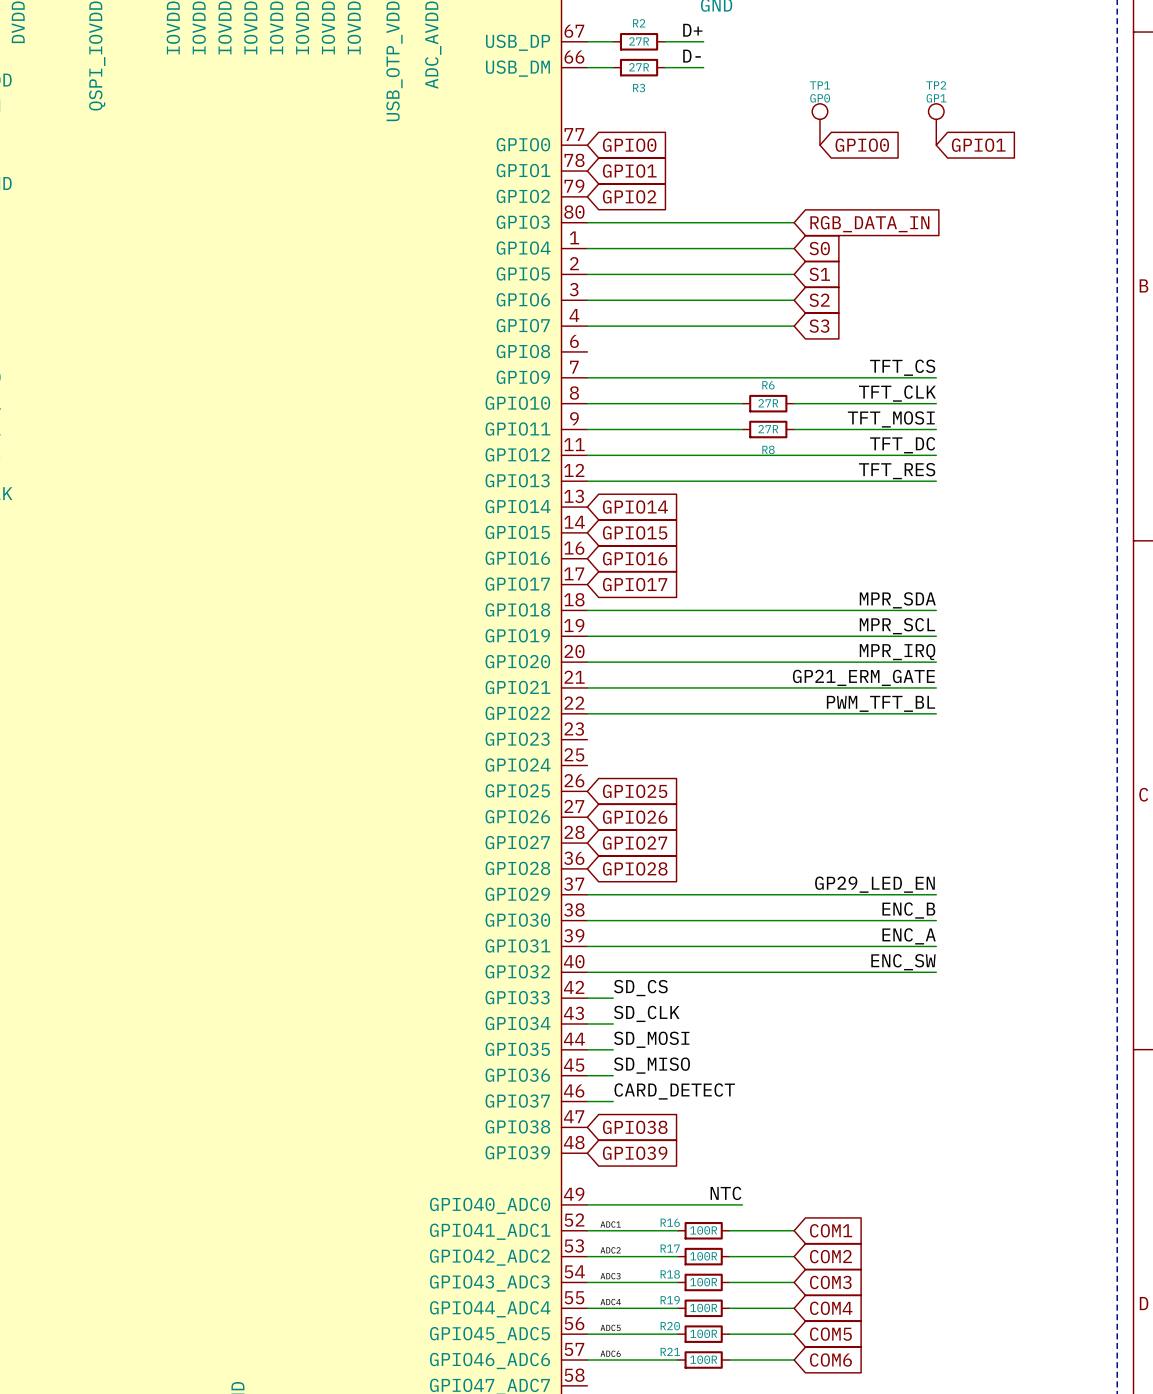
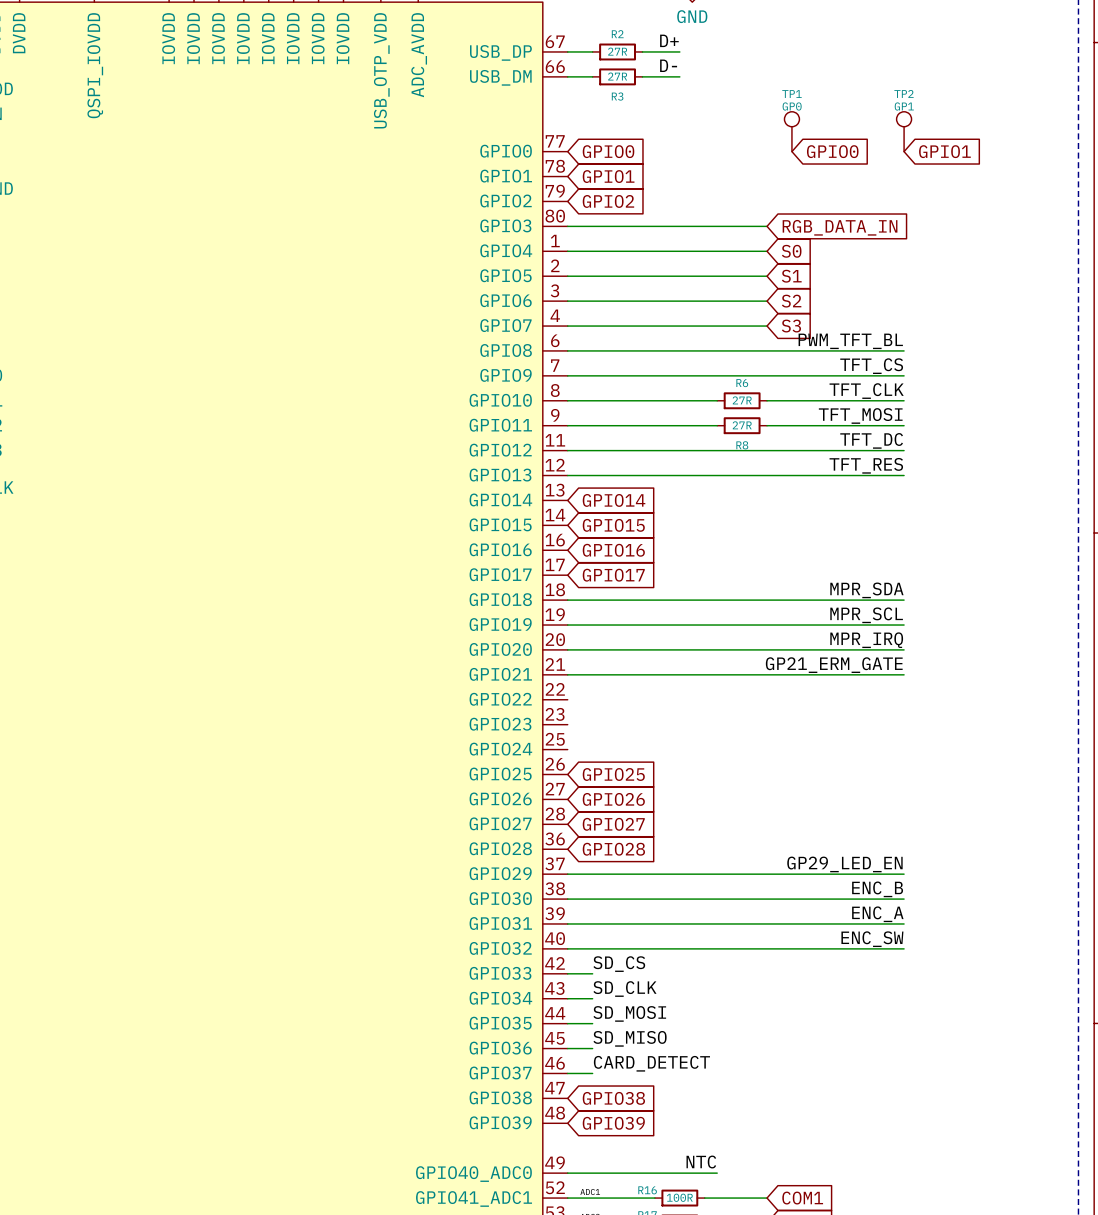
label: none -> PWM_TFT_BL (850, 341)
wire: none -> (567, 350) (904, 350)
label: PWM_TFT_BL (880, 703) -> none
wire: (587, 713) (936, 713) -> none

